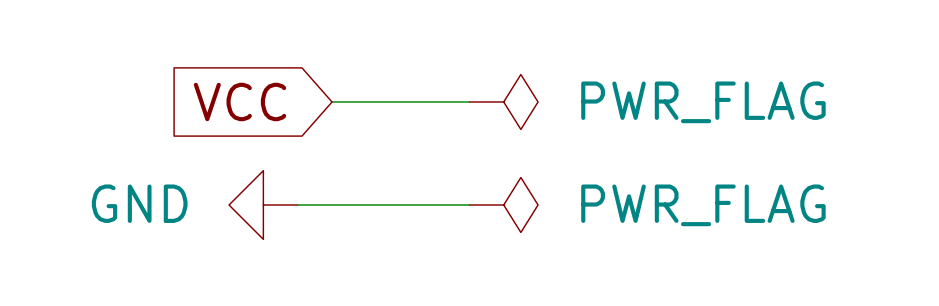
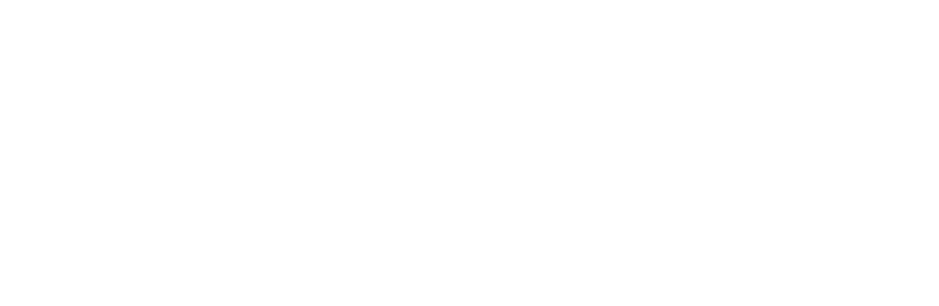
global label: VCC (240, 101) -> none
wire: (332, 101) (469, 101) -> none
power symbol: PWR_FLAG (503, 101) -> none
power symbol: GND (263, 204) -> none
wire: (297, 204) (469, 204) -> none
power symbol: PWR_FLAG (503, 204) -> none

